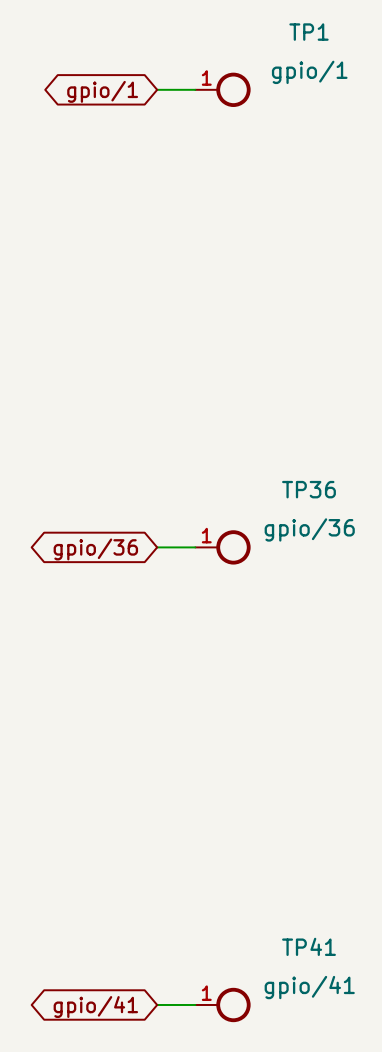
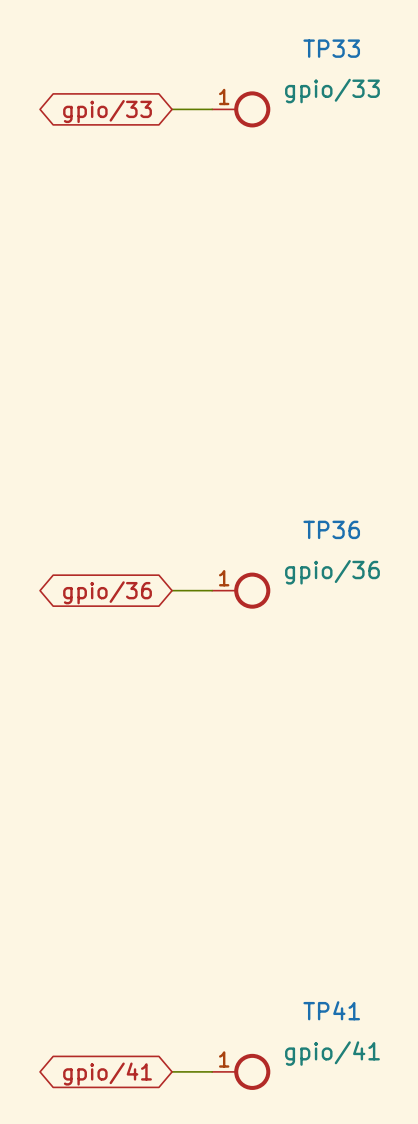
TP1 name: TP1 (308, 32) -> TP33 (331, 48)
TP1 value: gpio/1 (309, 72) -> gpio/33 (332, 91)
global label: gpio/1 (102, 91) -> gpio/33 (107, 111)

